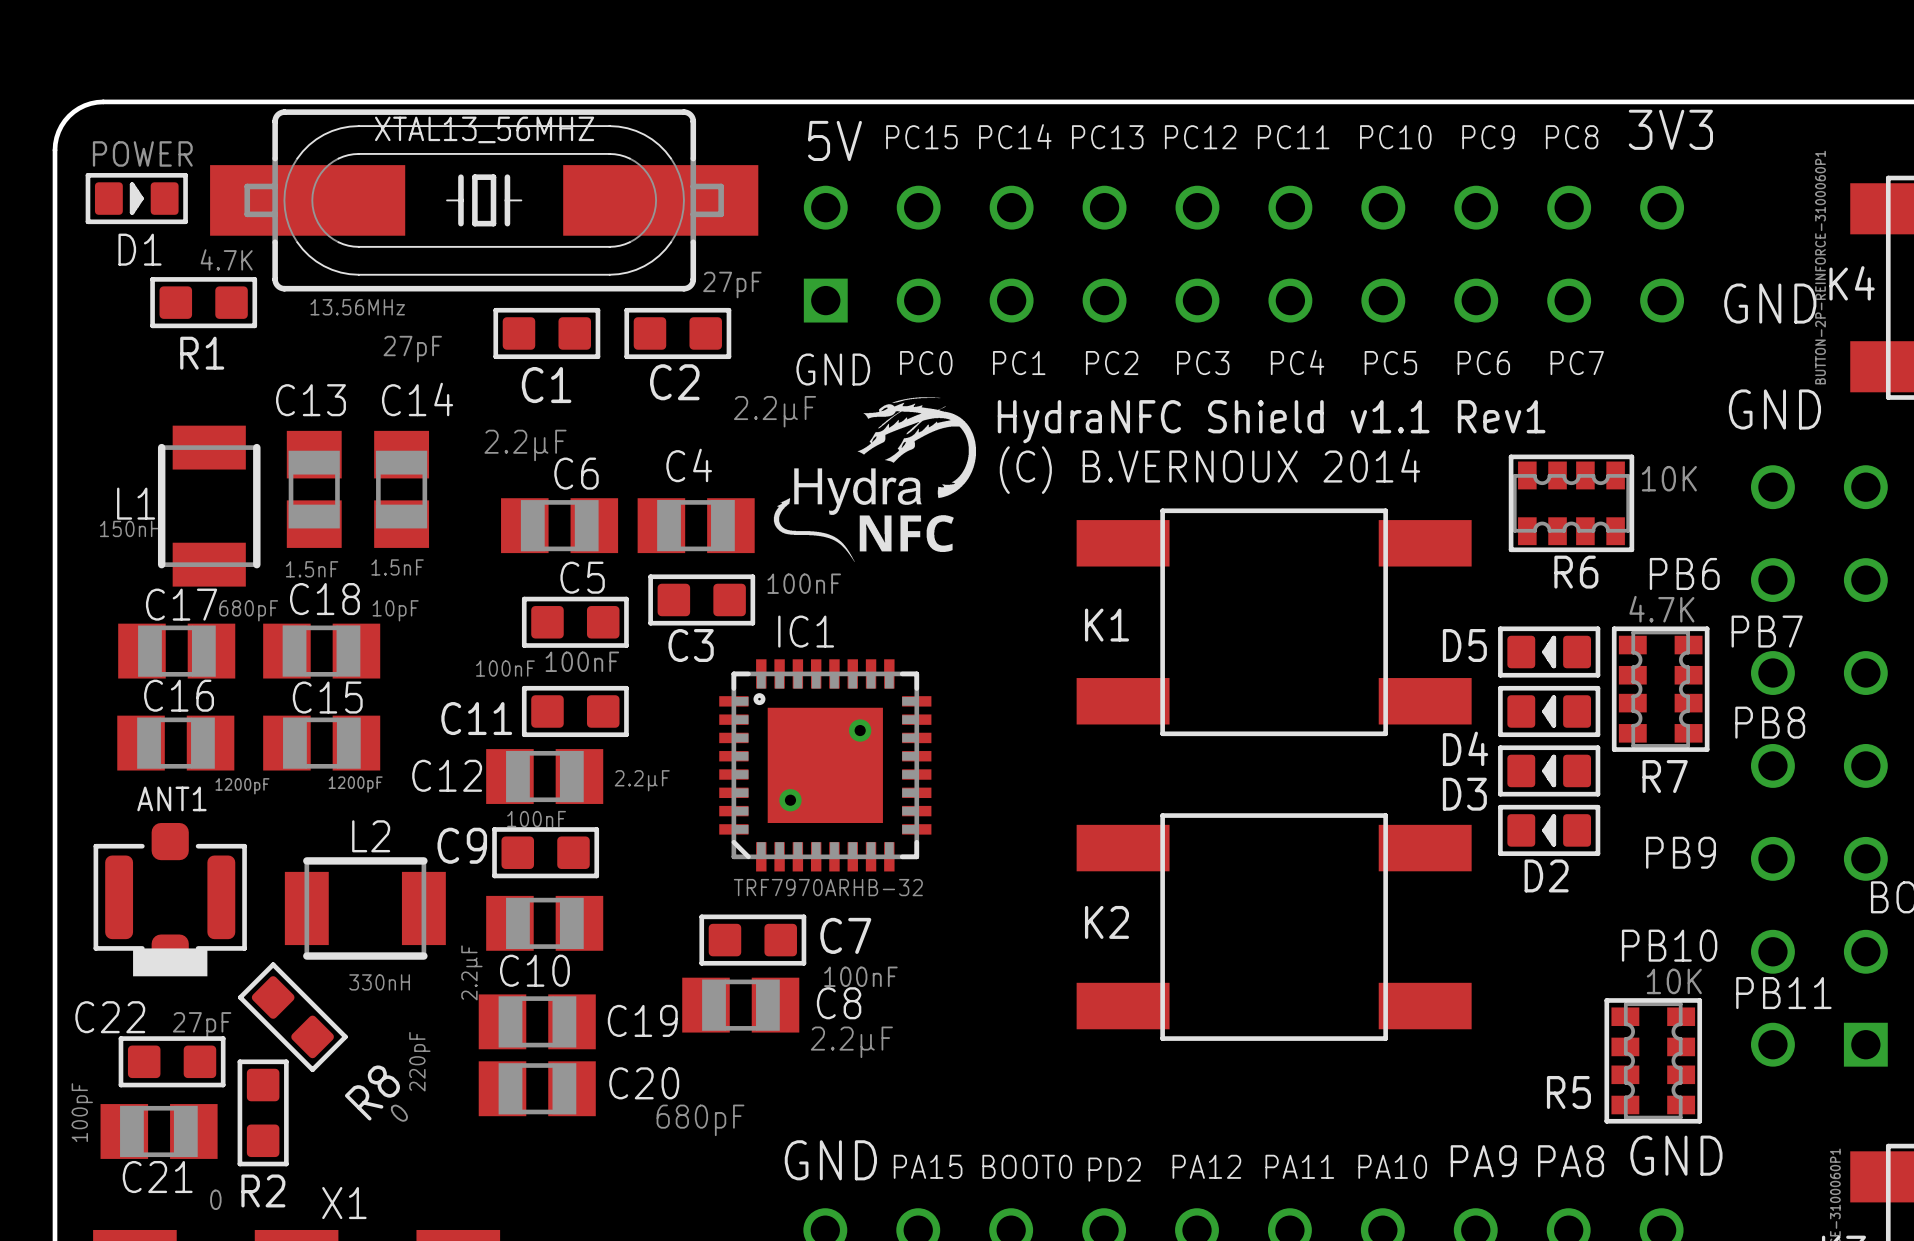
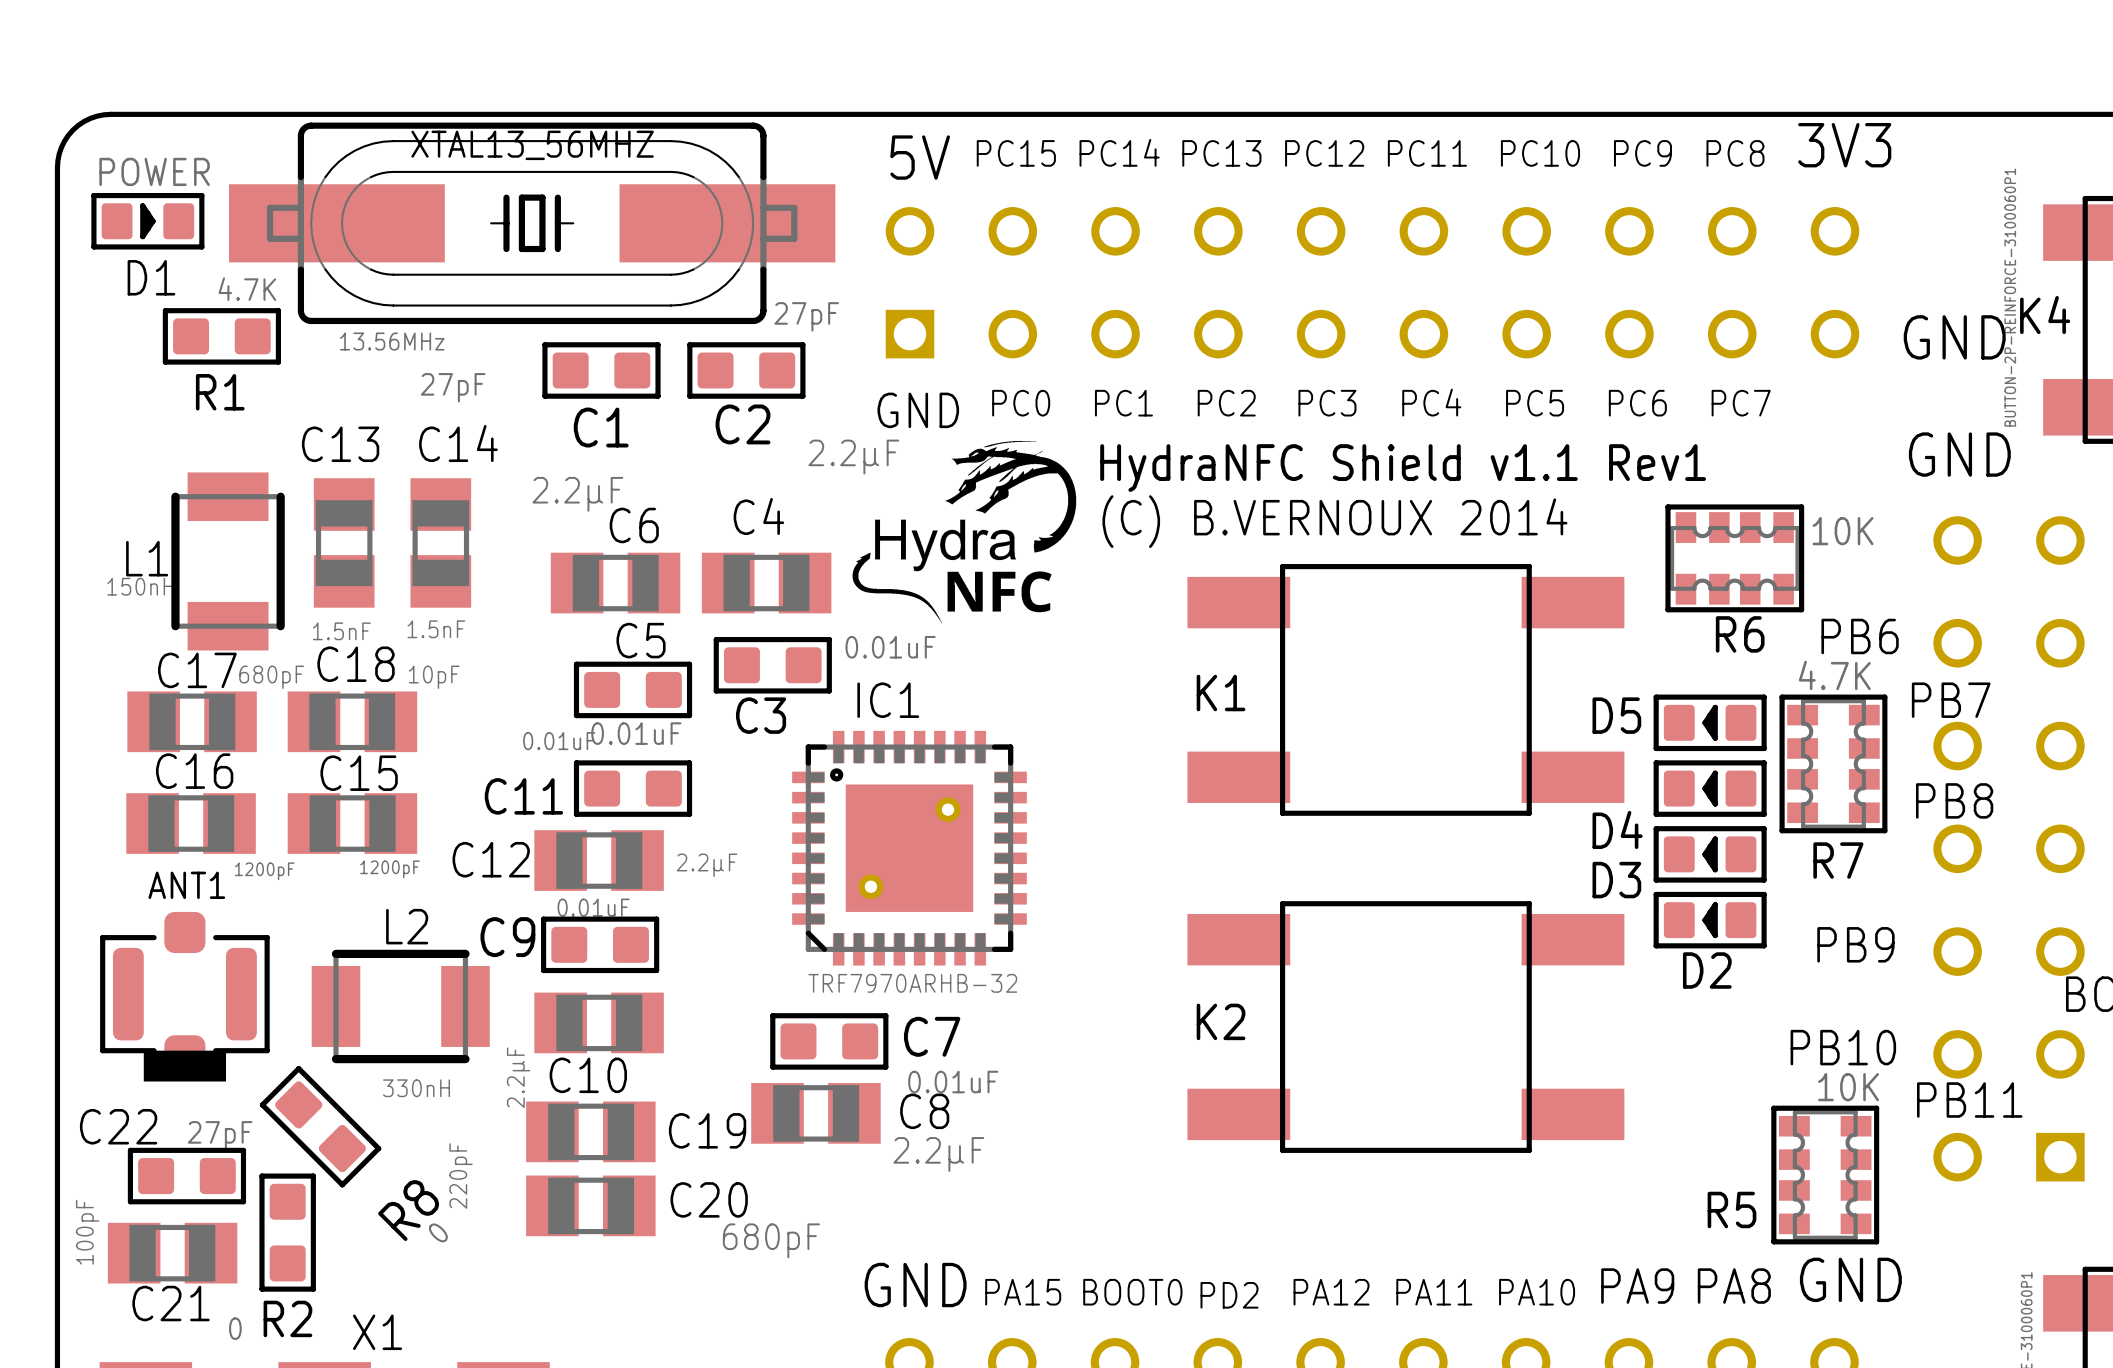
C3 value: 100nF (804, 583) -> 0.01uF (890, 647)
C5 value: 100nF (582, 661) -> 0.01uF (636, 733)
C11 value: 100nF (505, 668) -> 0.01uF (559, 741)
C9 value: 100nF (536, 819) -> 0.01uF (593, 907)
C7 value: 100nF (860, 976) -> 0.01uF (953, 1082)

